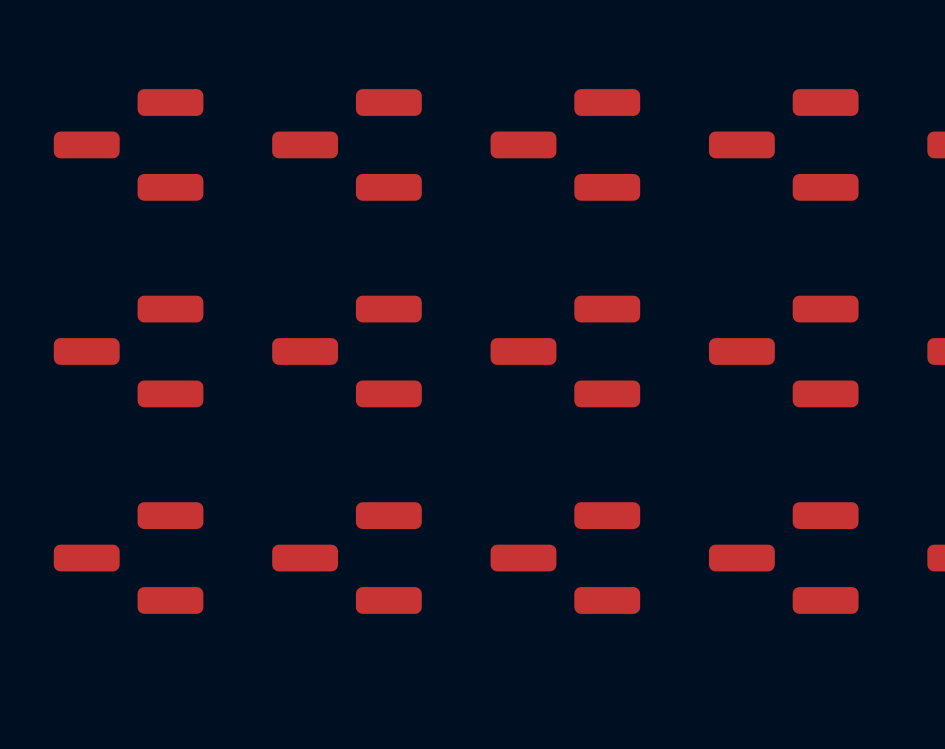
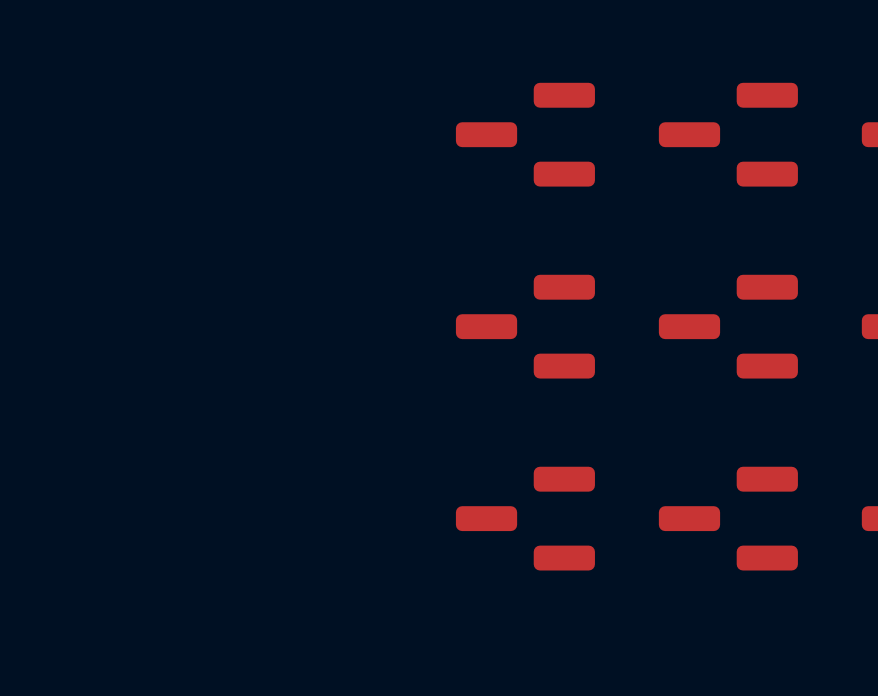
part: (128, 144) -> none
part: (346, 144) -> none
part: (128, 351) -> none
part: (346, 351) -> none
part: (128, 558) -> none
part: (346, 558) -> none

